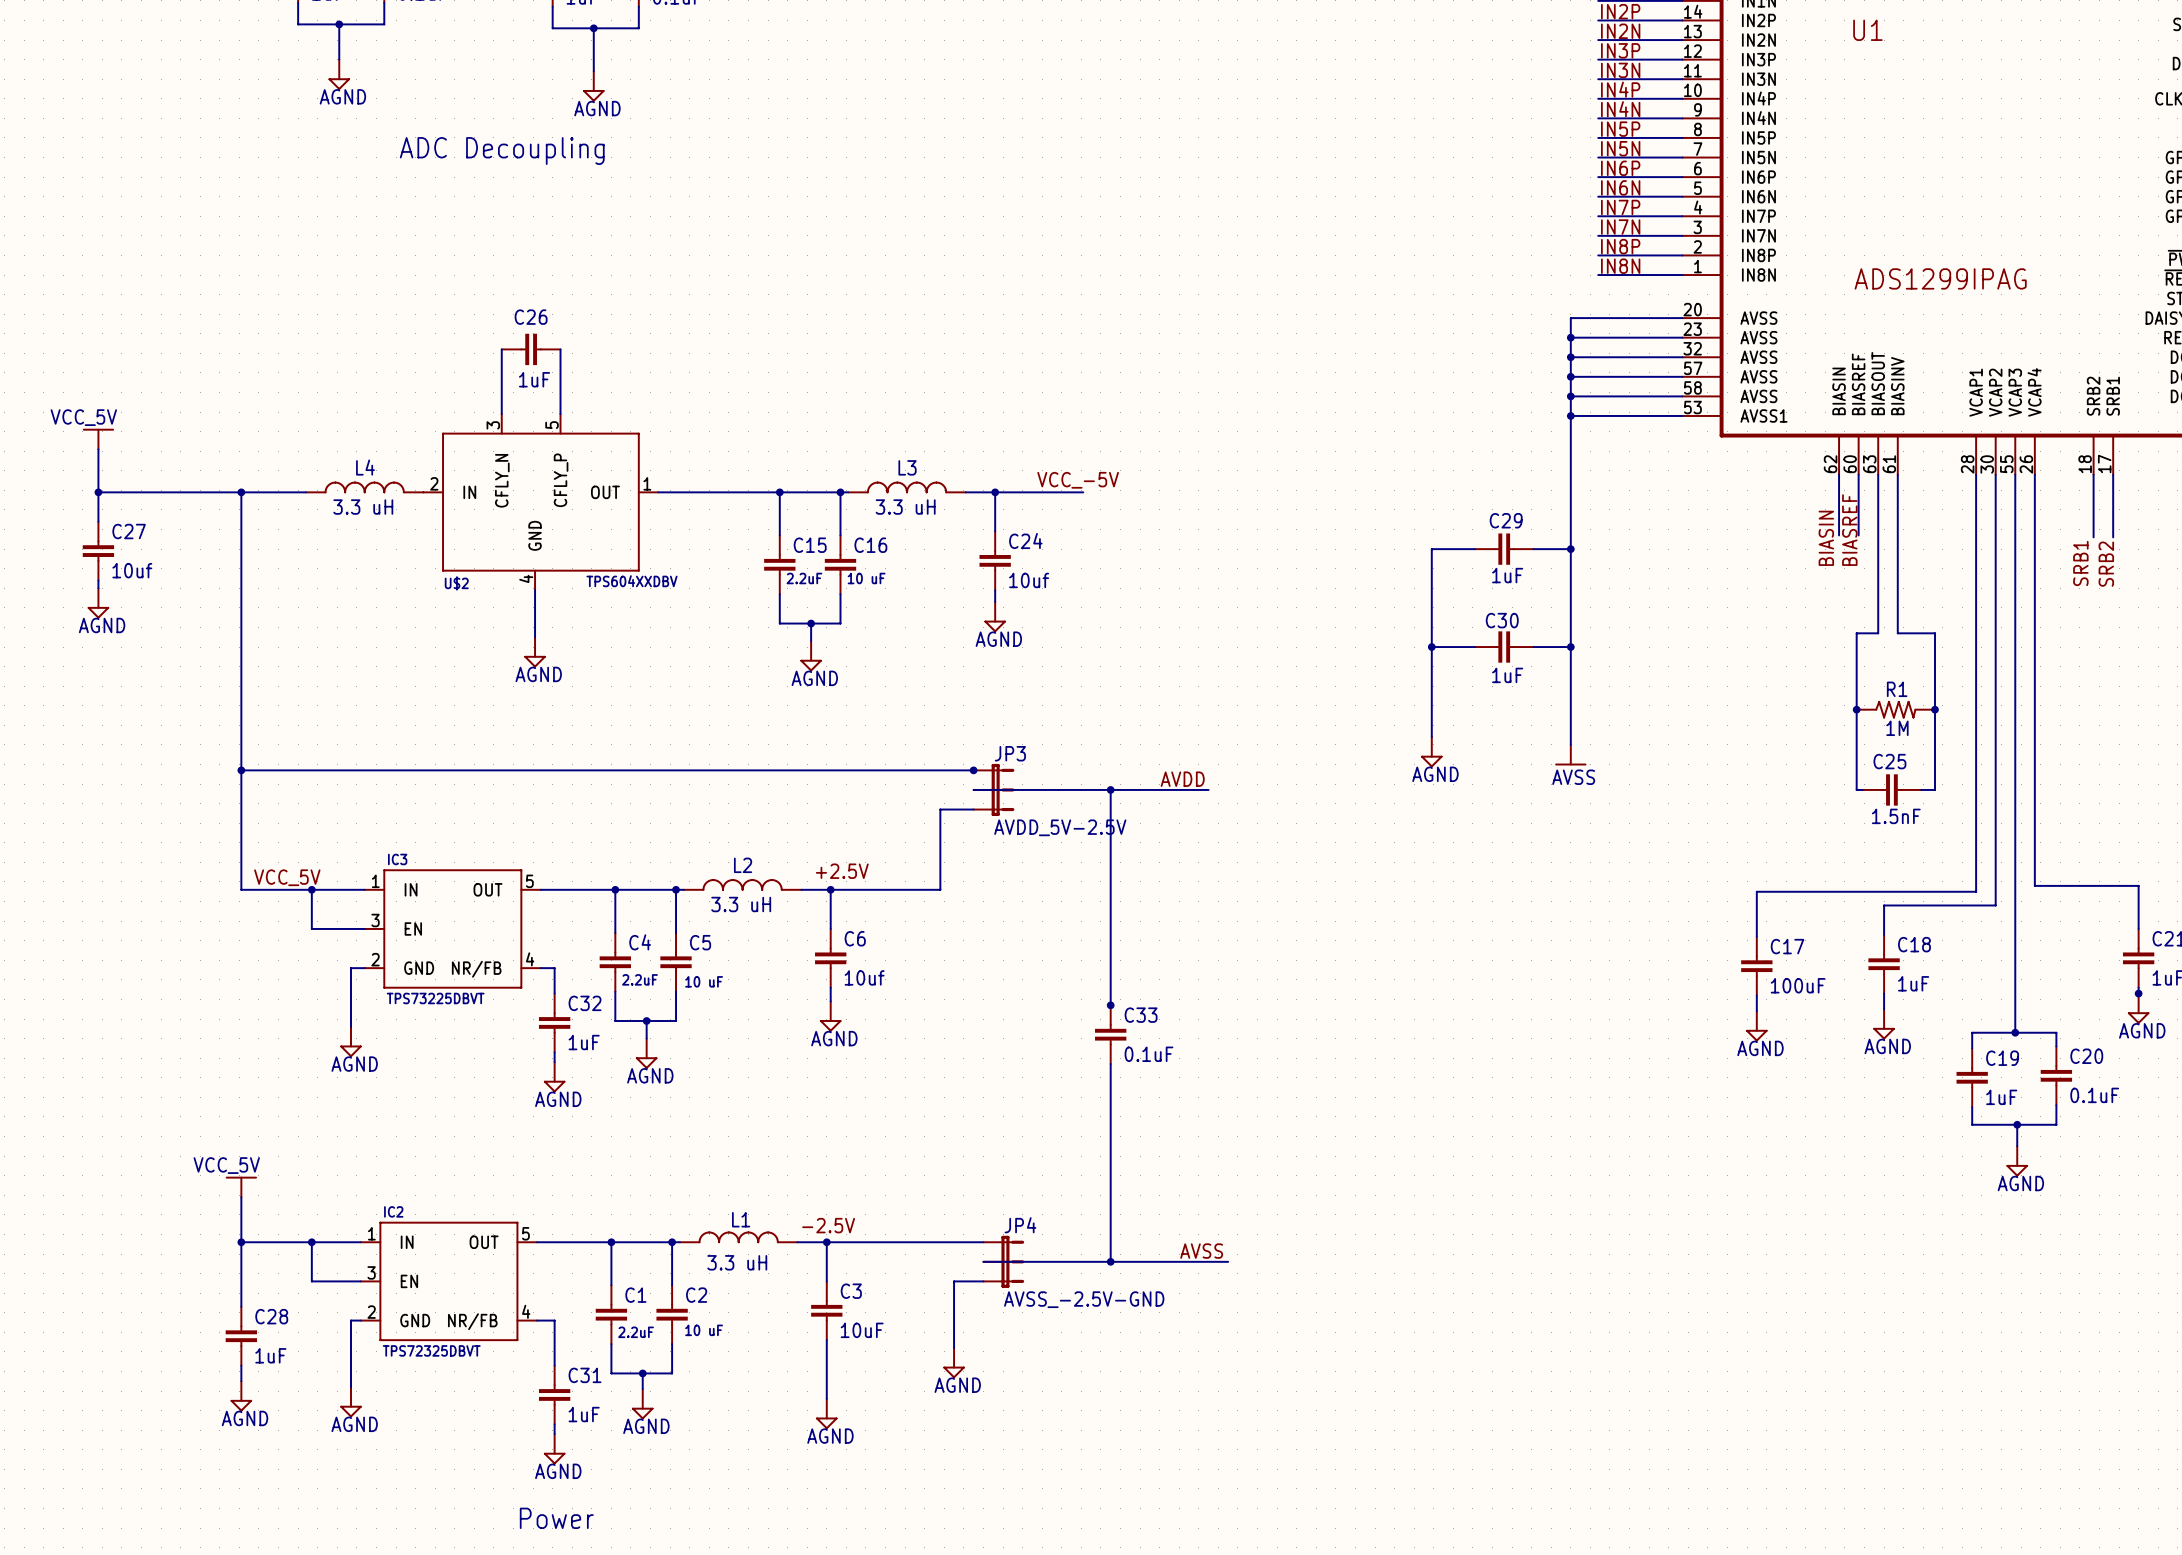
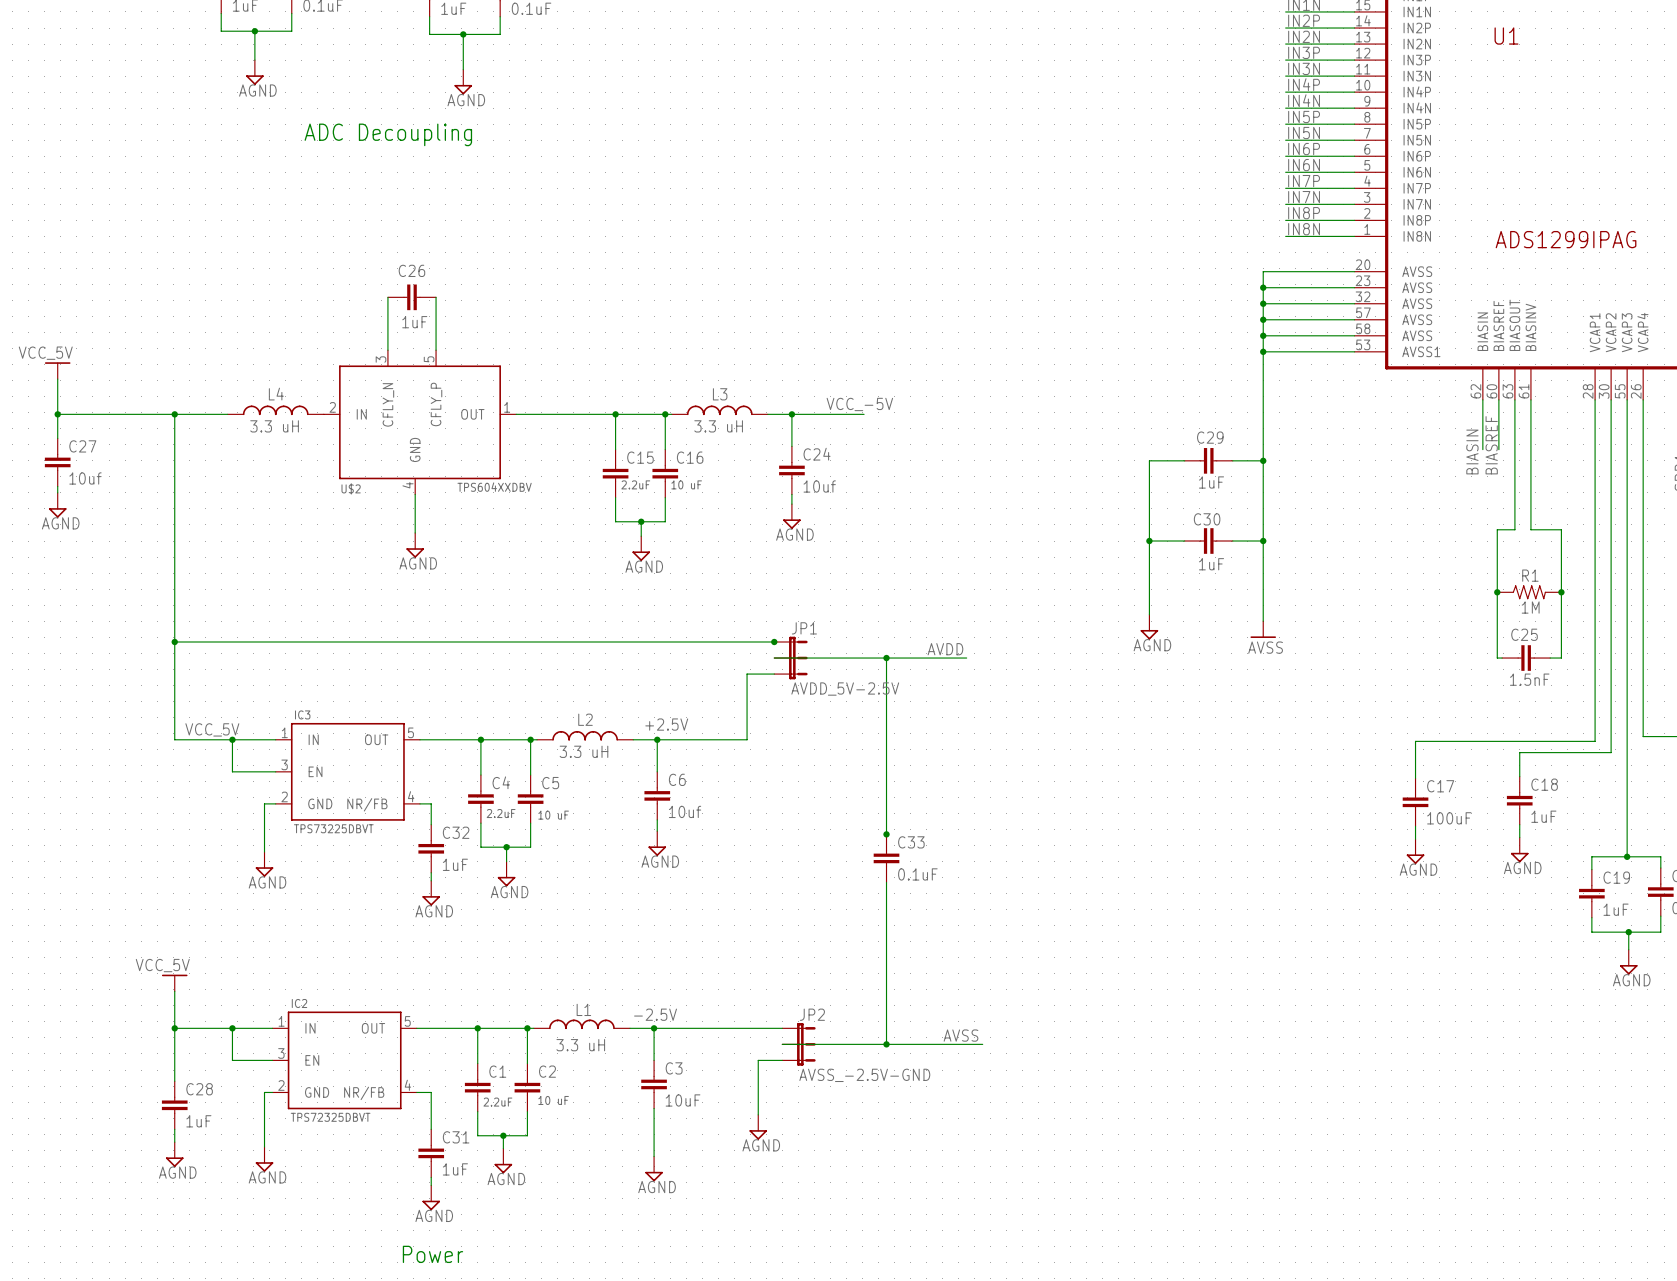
JP3 name: JP3 (1010, 753) -> JP1 (804, 628)
JP4 name: JP4 (1020, 1225) -> JP2 (812, 1014)

